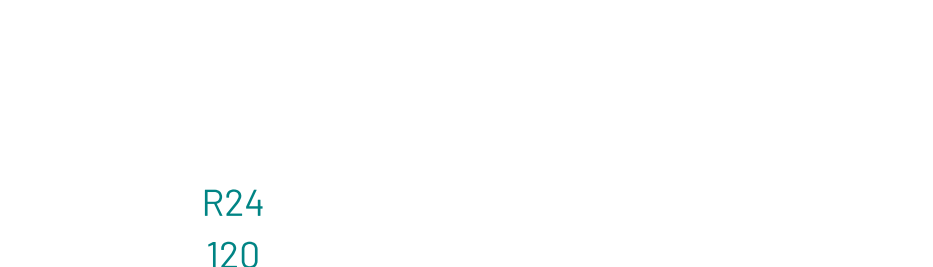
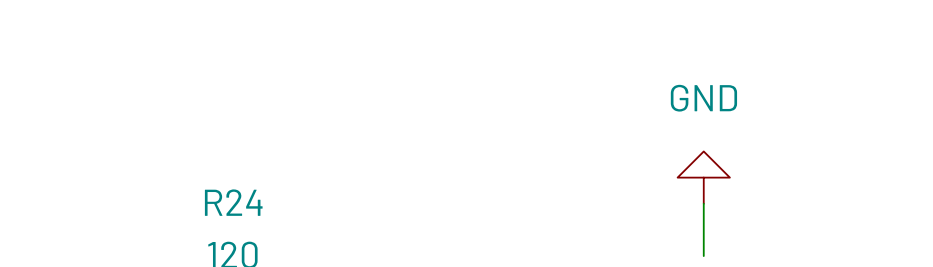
power symbol: none -> GND (703, 177)
wire: none -> (703, 203) (703, 256)

